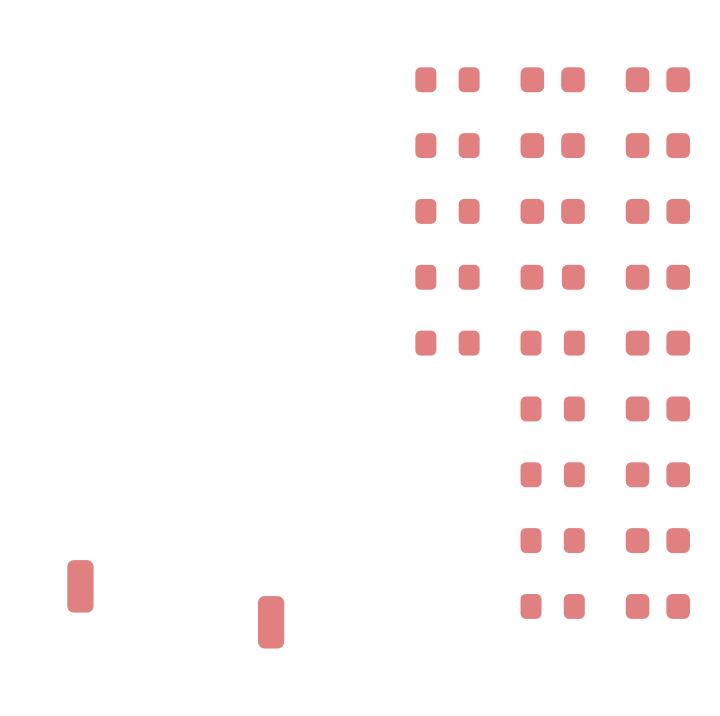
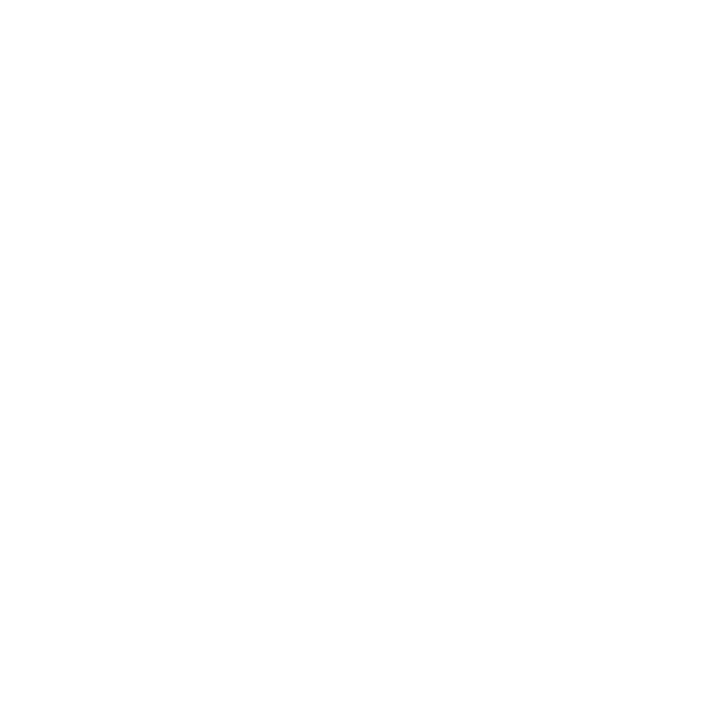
part: (447, 79) -> none
part: (552, 79) -> none
part: (657, 79) -> none
part: (447, 145) -> none
part: (552, 145) -> none
part: (657, 145) -> none
part: (447, 211) -> none
part: (552, 211) -> none
part: (657, 211) -> none
part: (447, 277) -> none
part: (552, 277) -> none
part: (657, 277) -> none
part: (447, 343) -> none
part: (552, 343) -> none
part: (657, 343) -> none
part: (552, 408) -> none
part: (657, 408) -> none
part: (552, 474) -> none
part: (657, 474) -> none
part: (552, 540) -> none
part: (657, 540) -> none
part: (80, 586) -> none
part: (552, 606) -> none
part: (657, 606) -> none
part: (271, 622) -> none

